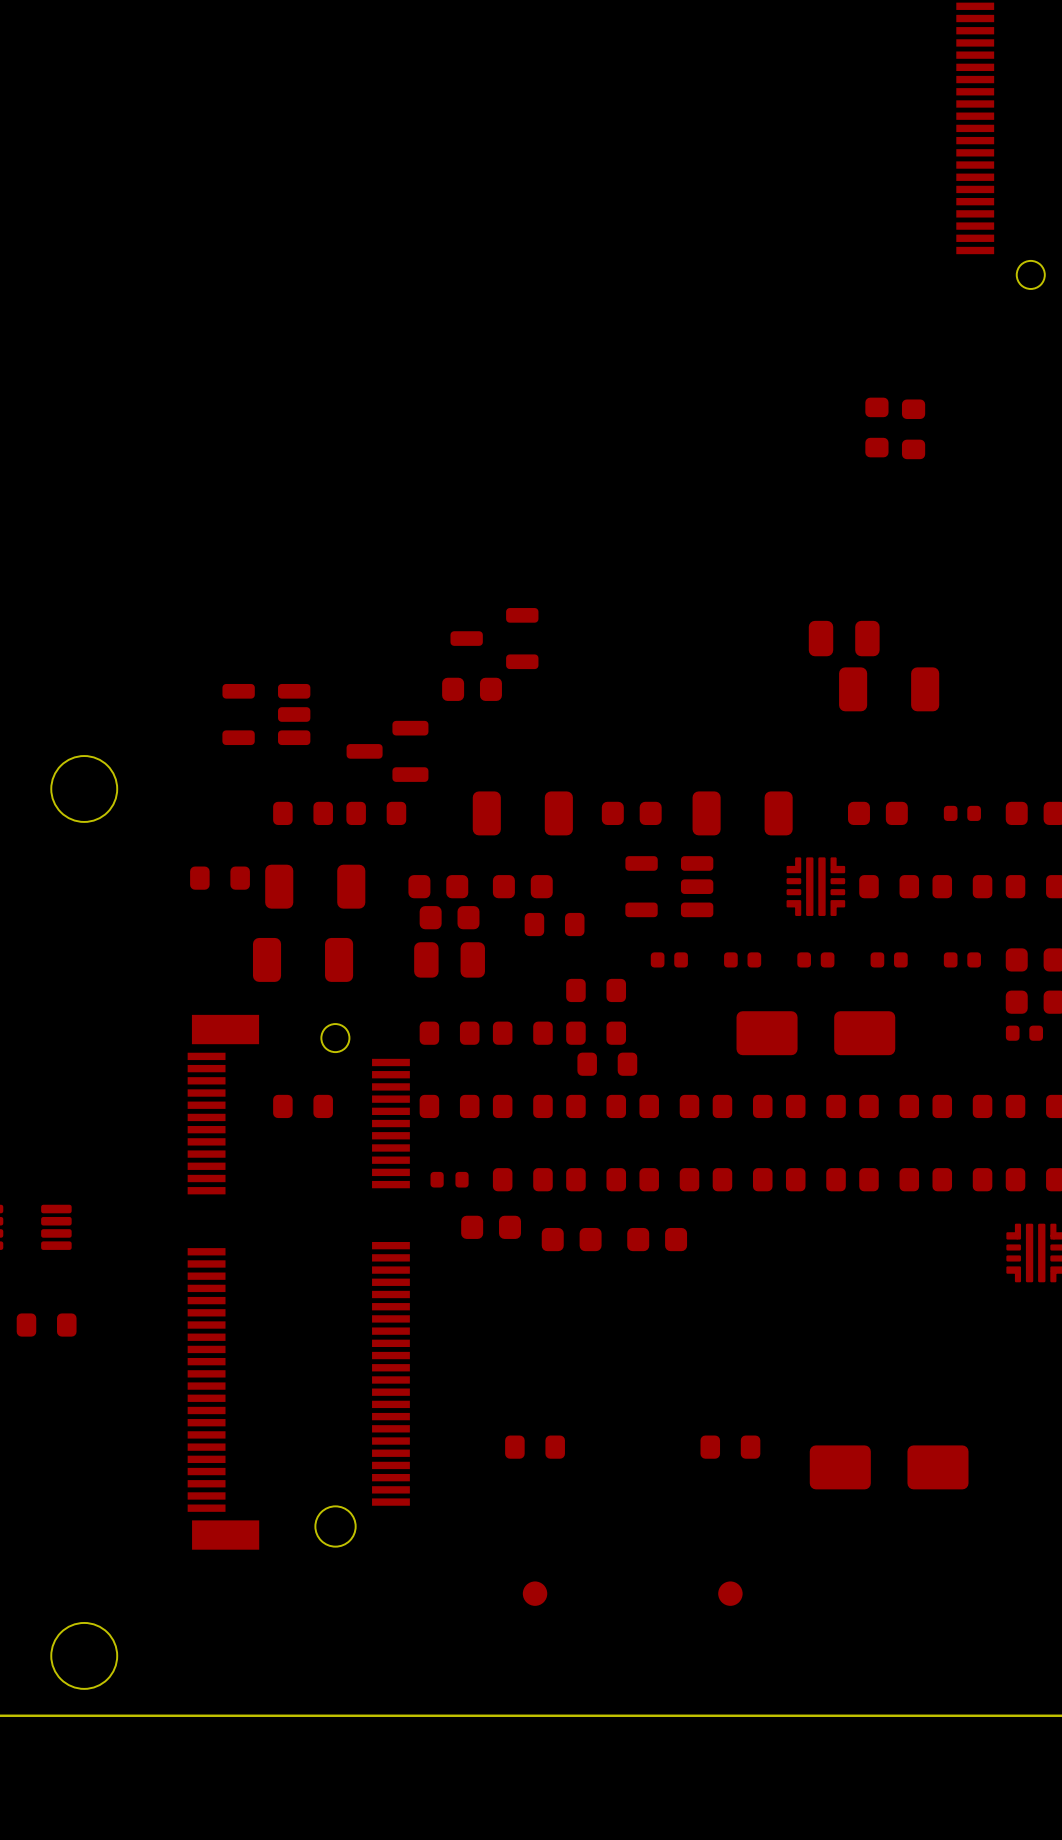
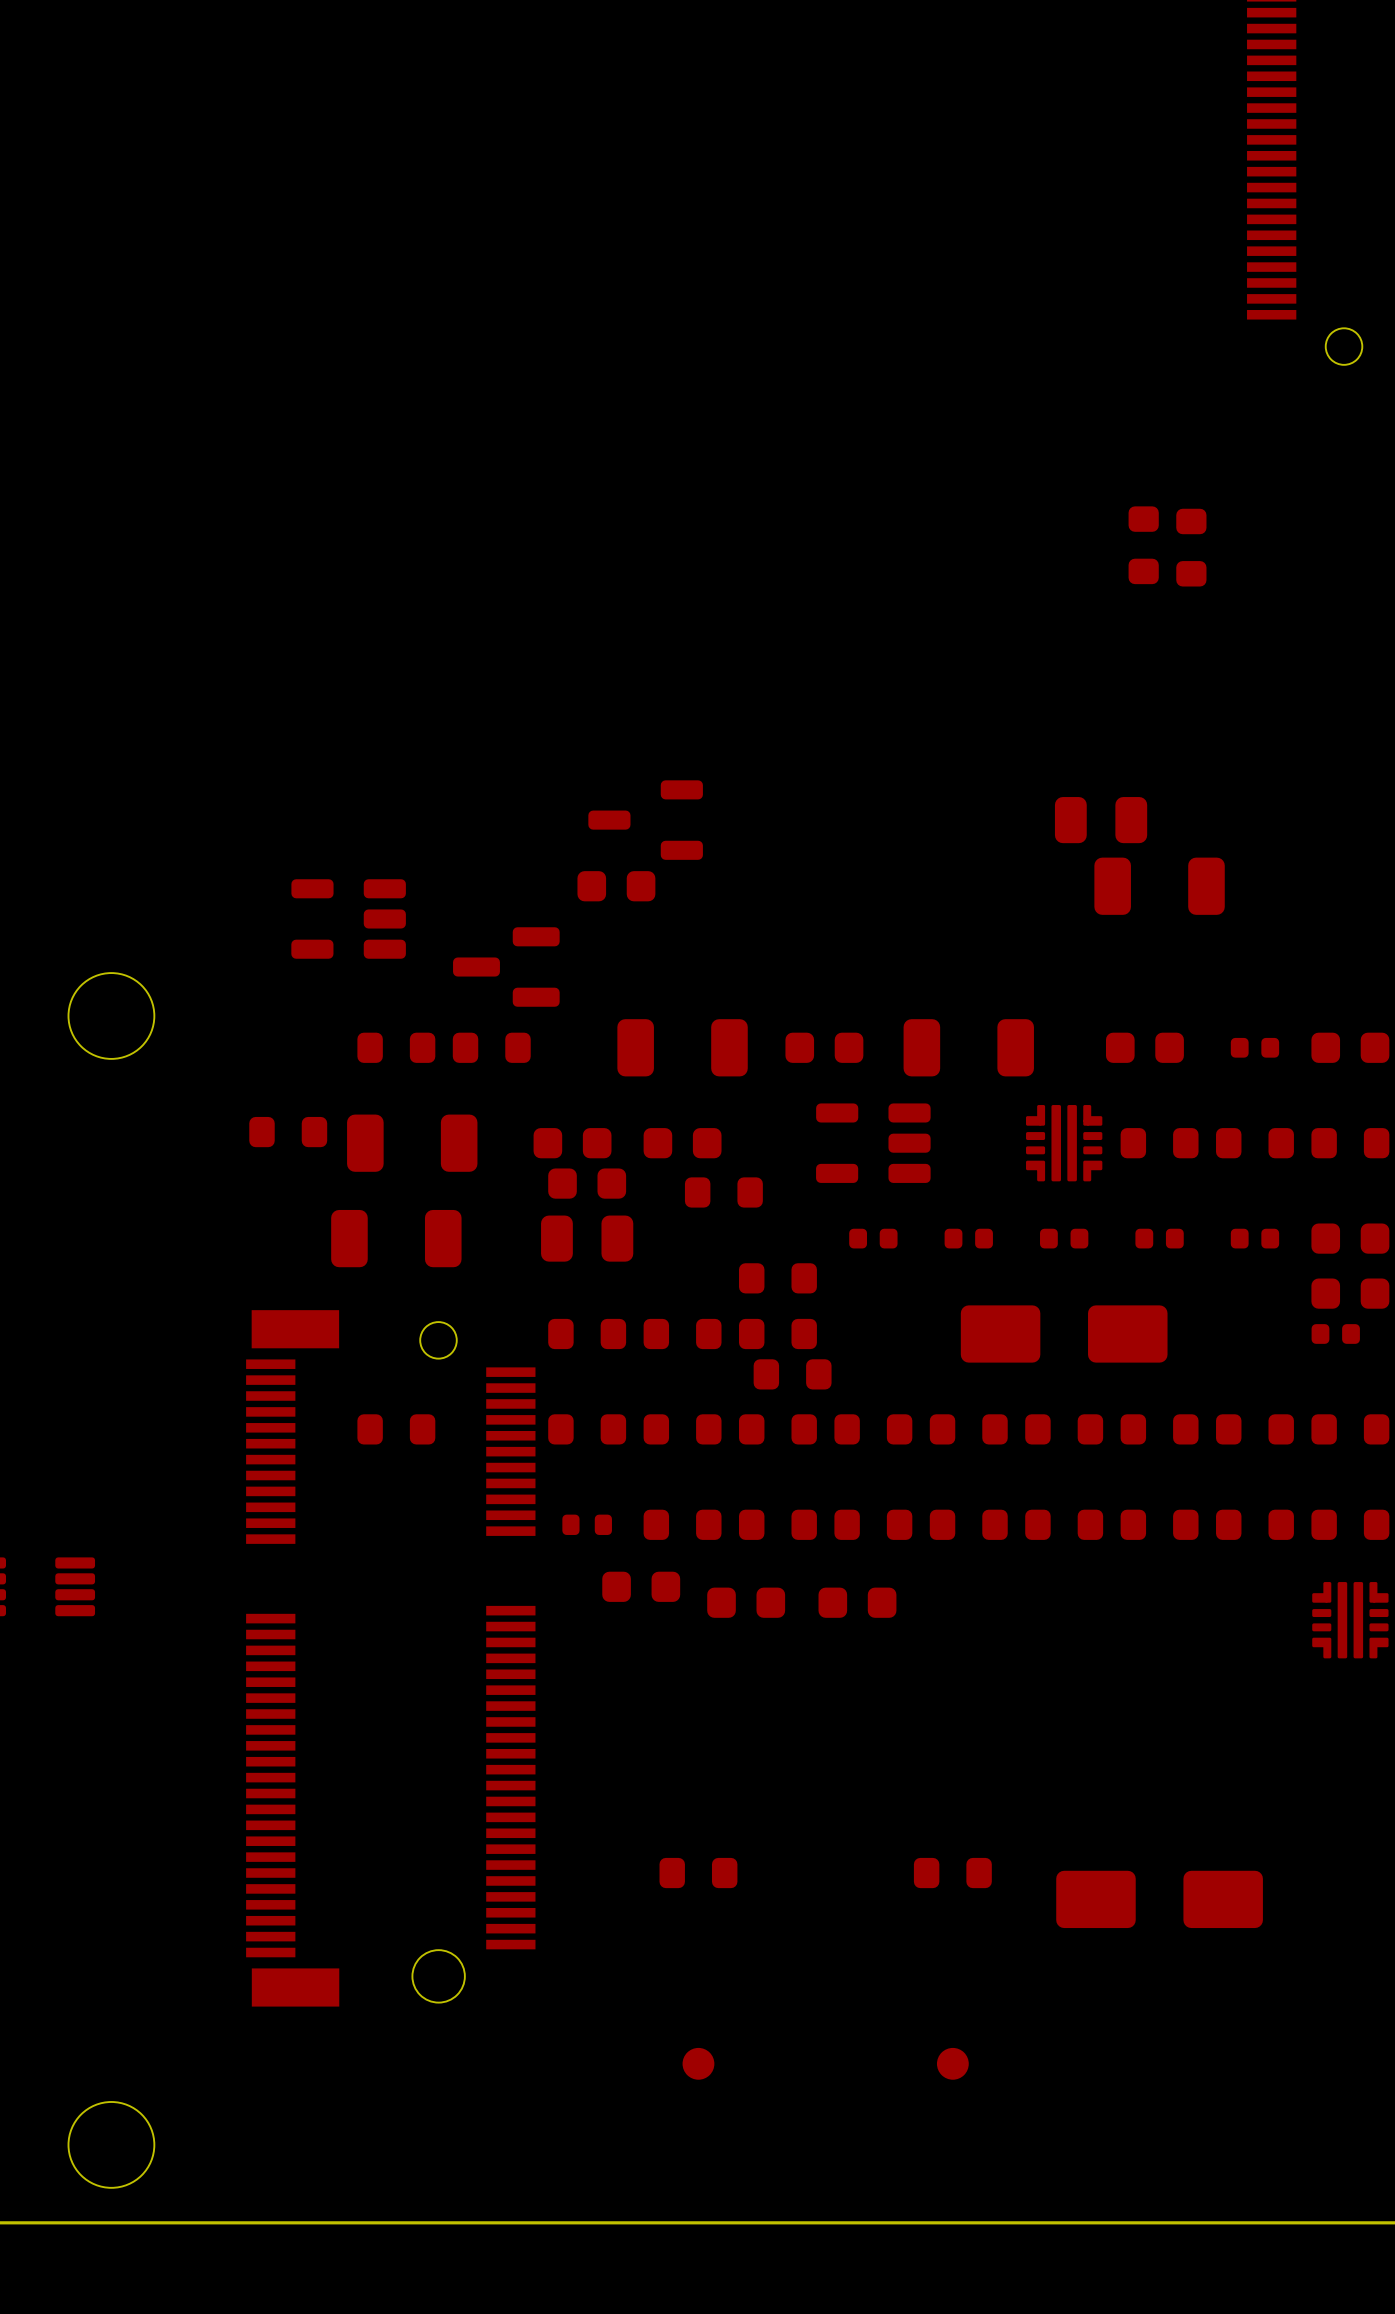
part: (46, 1325) -> none

